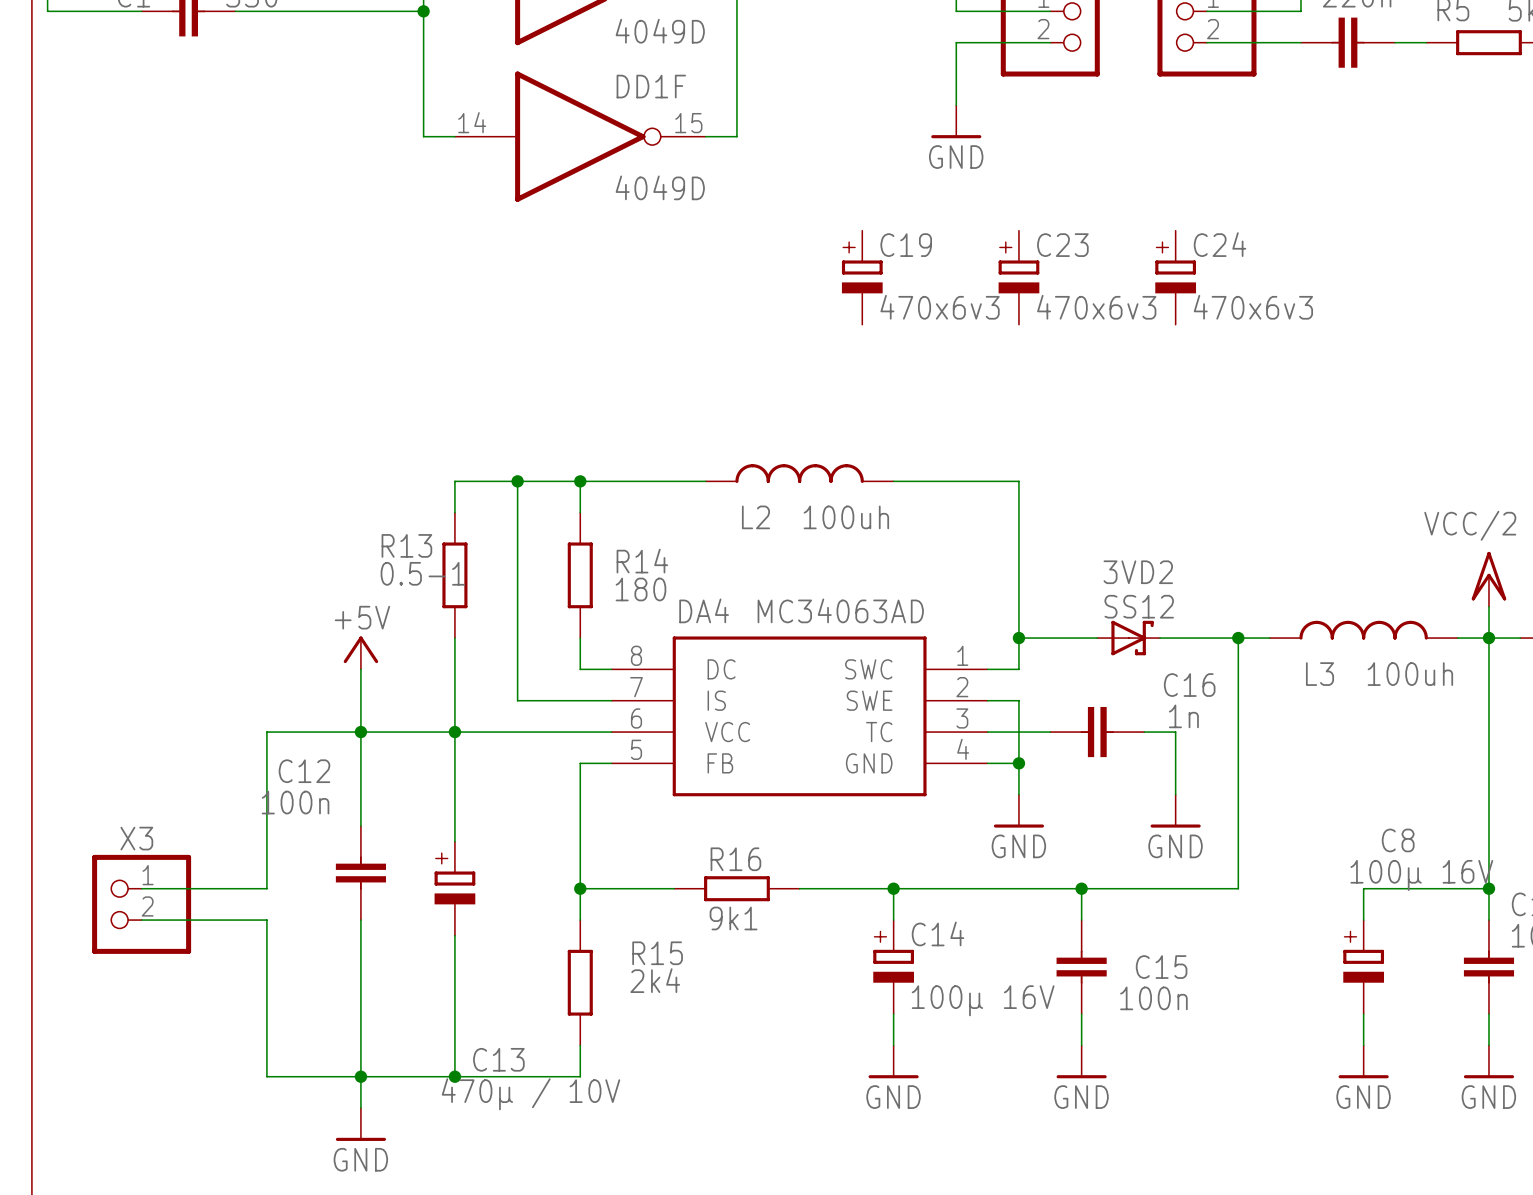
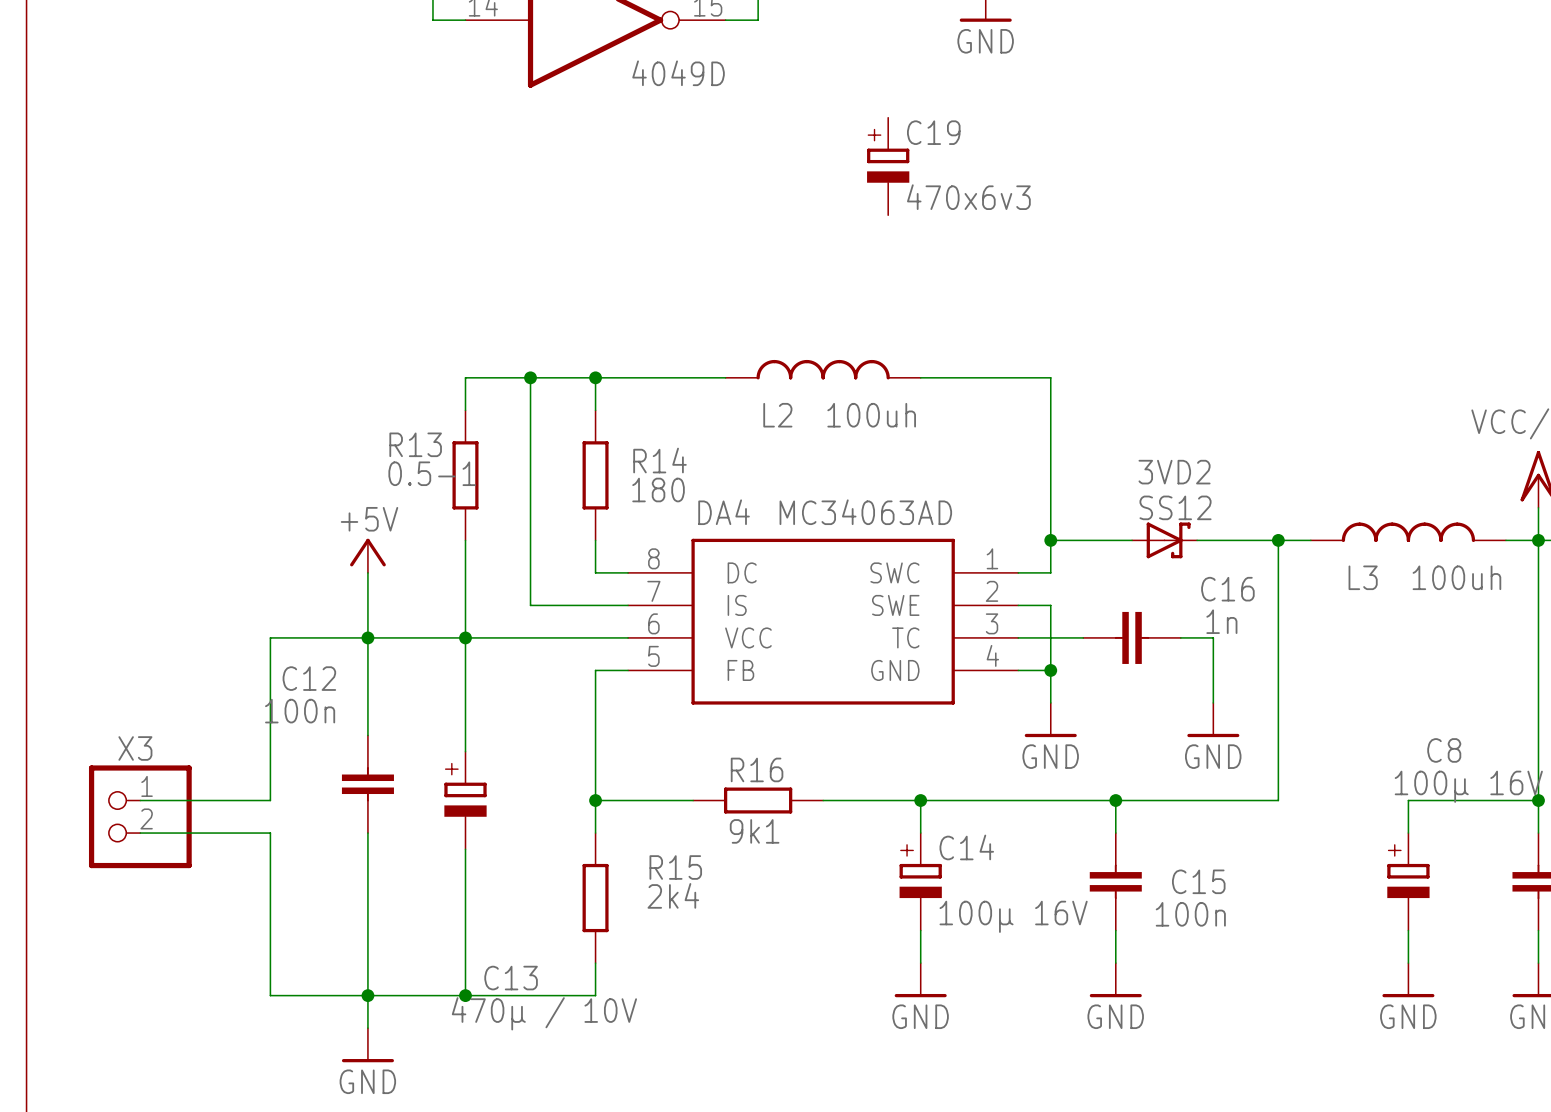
C23: 470x6v3 (1018, 277) -> none
C24: 470x6v3 (1175, 277) -> none

